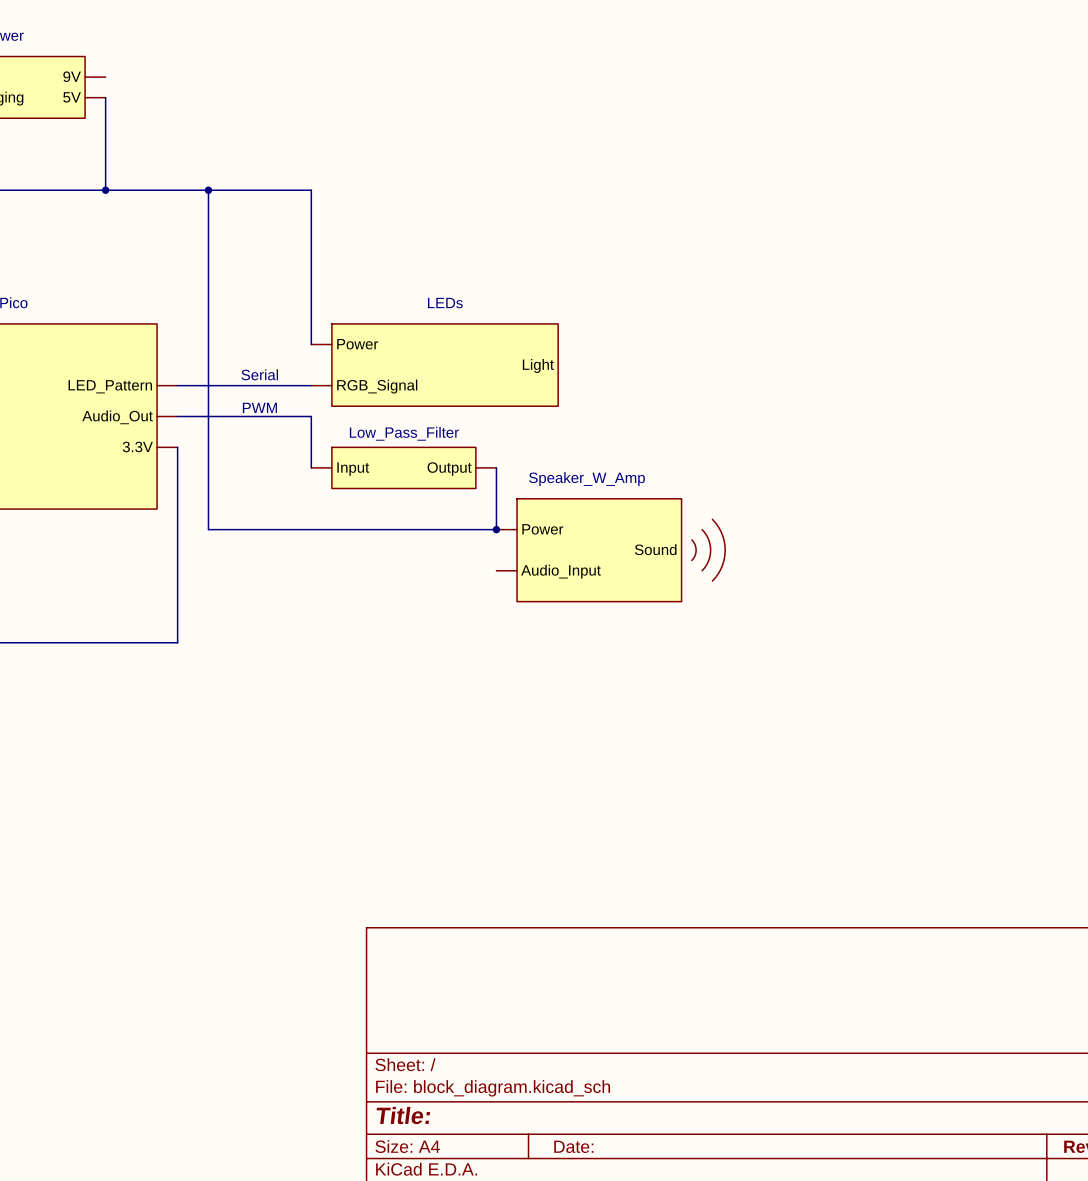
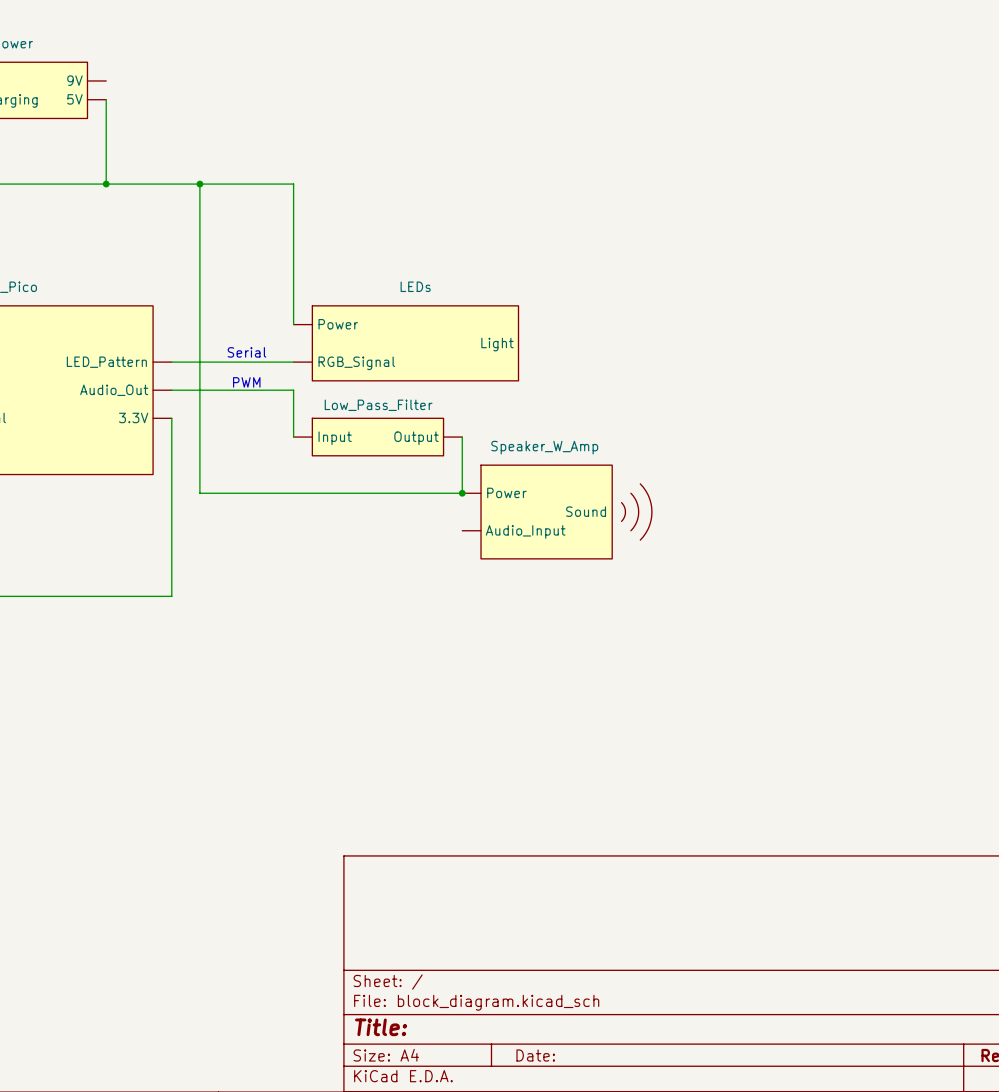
Speaker_W_Amp: none -> (557, 512)
Speaker_W_Amp: (610, 550) -> none

